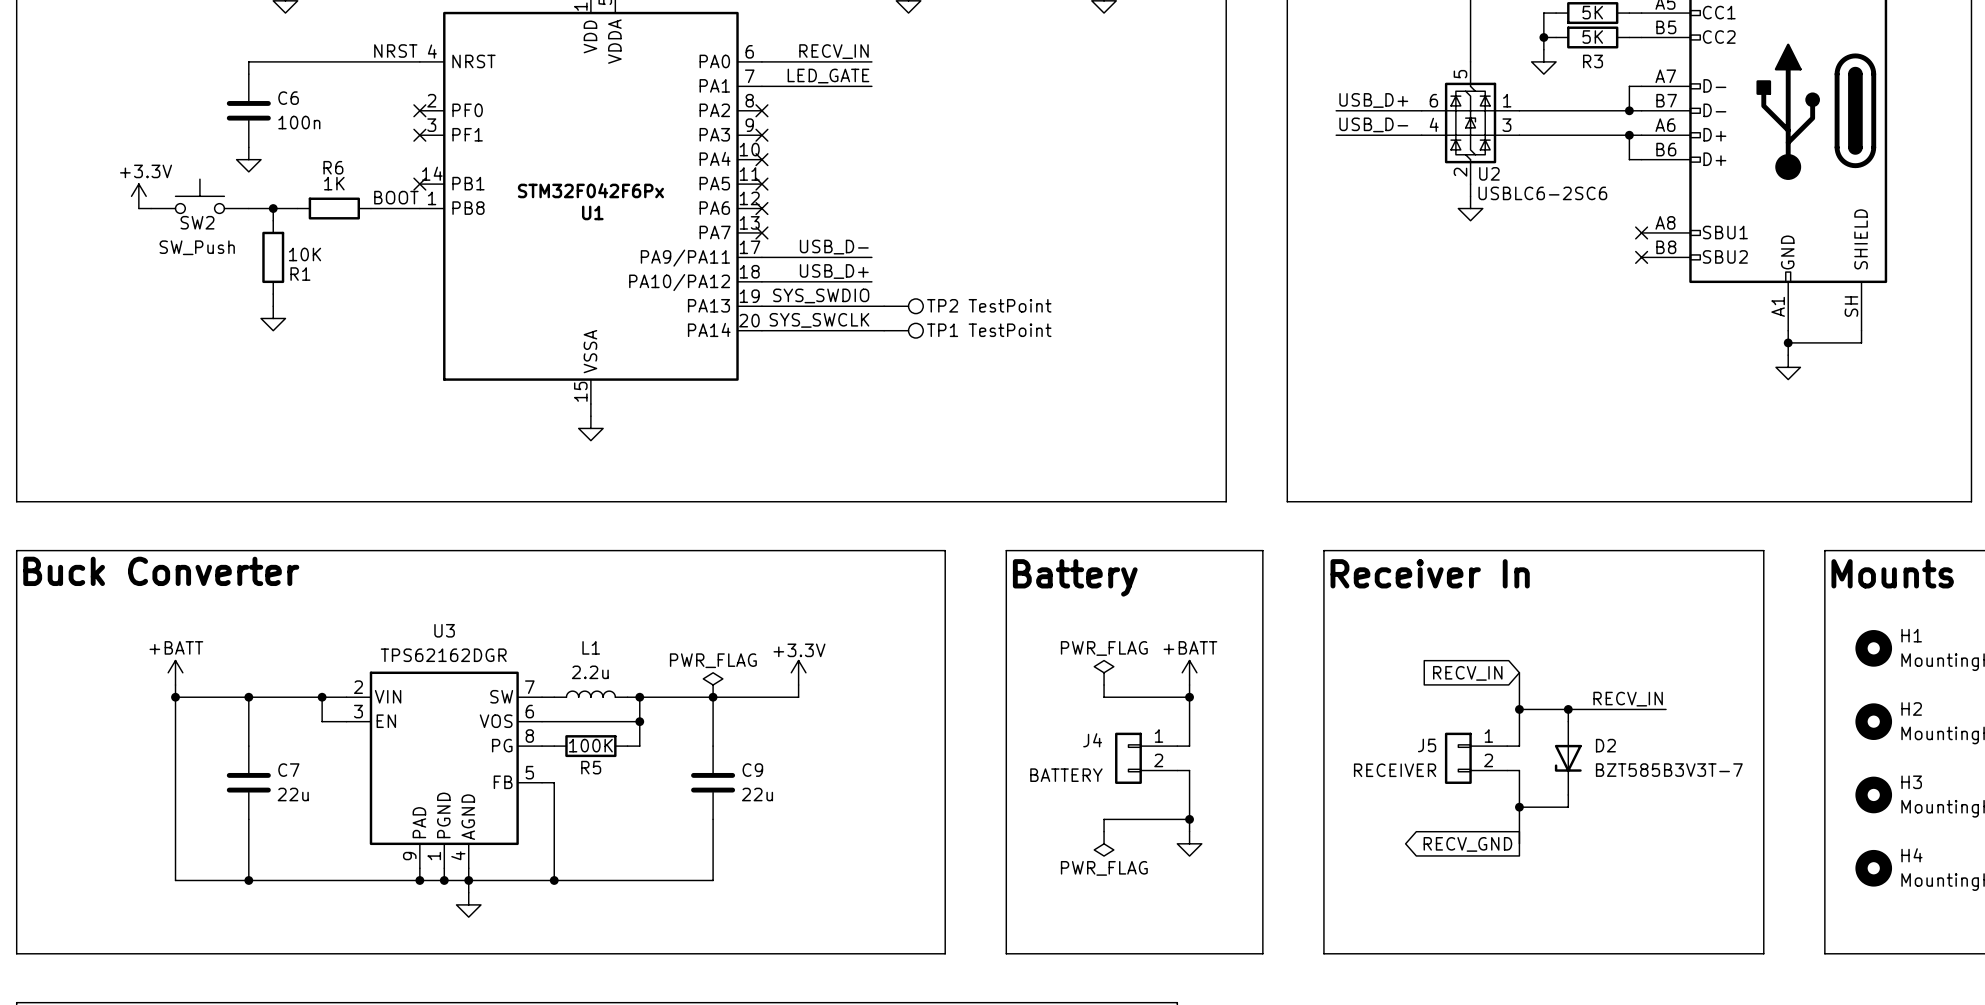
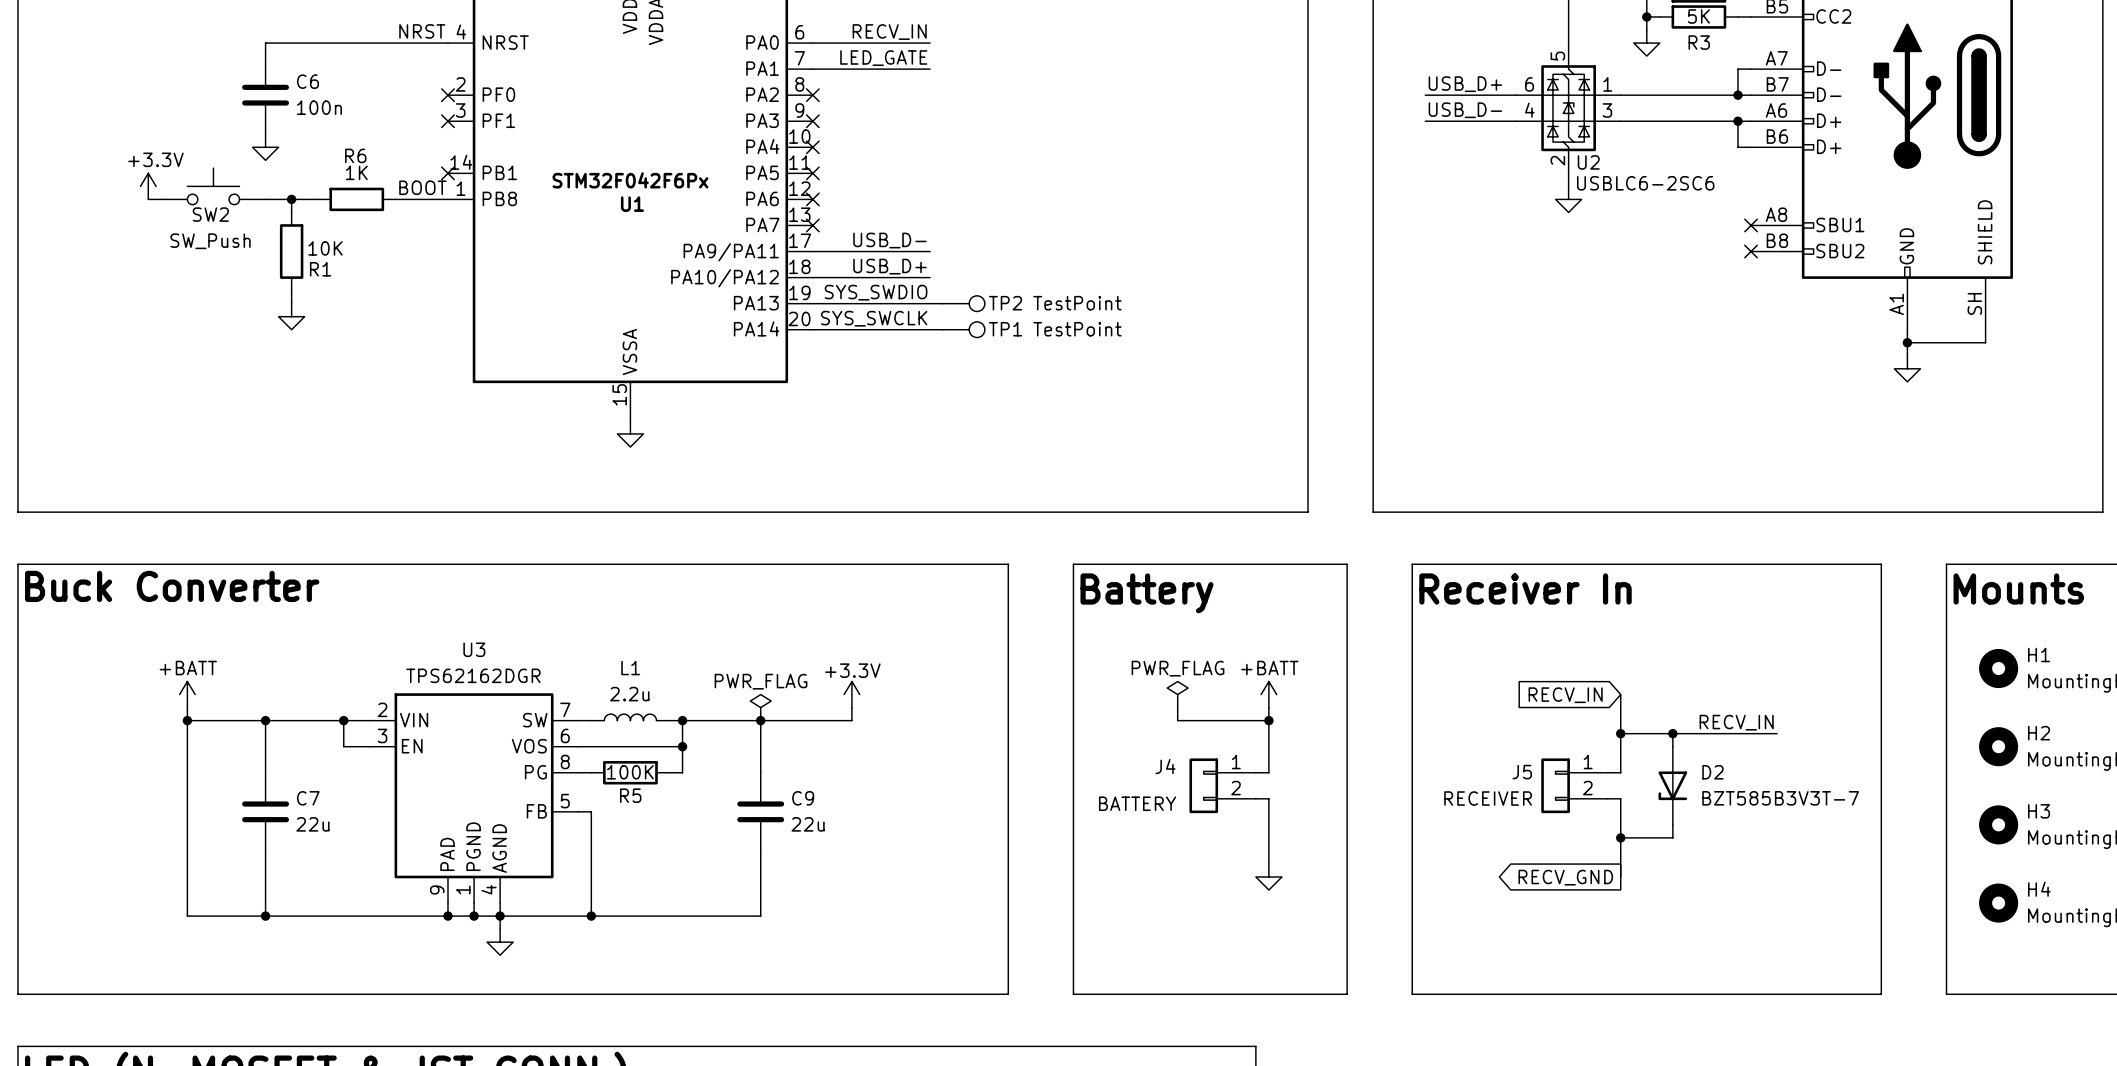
wire: (1189, 819) (1104, 819) (1104, 831) -> none
junction: (1189, 819) -> none
power symbol: PWR_FLAG (1104, 843) -> none

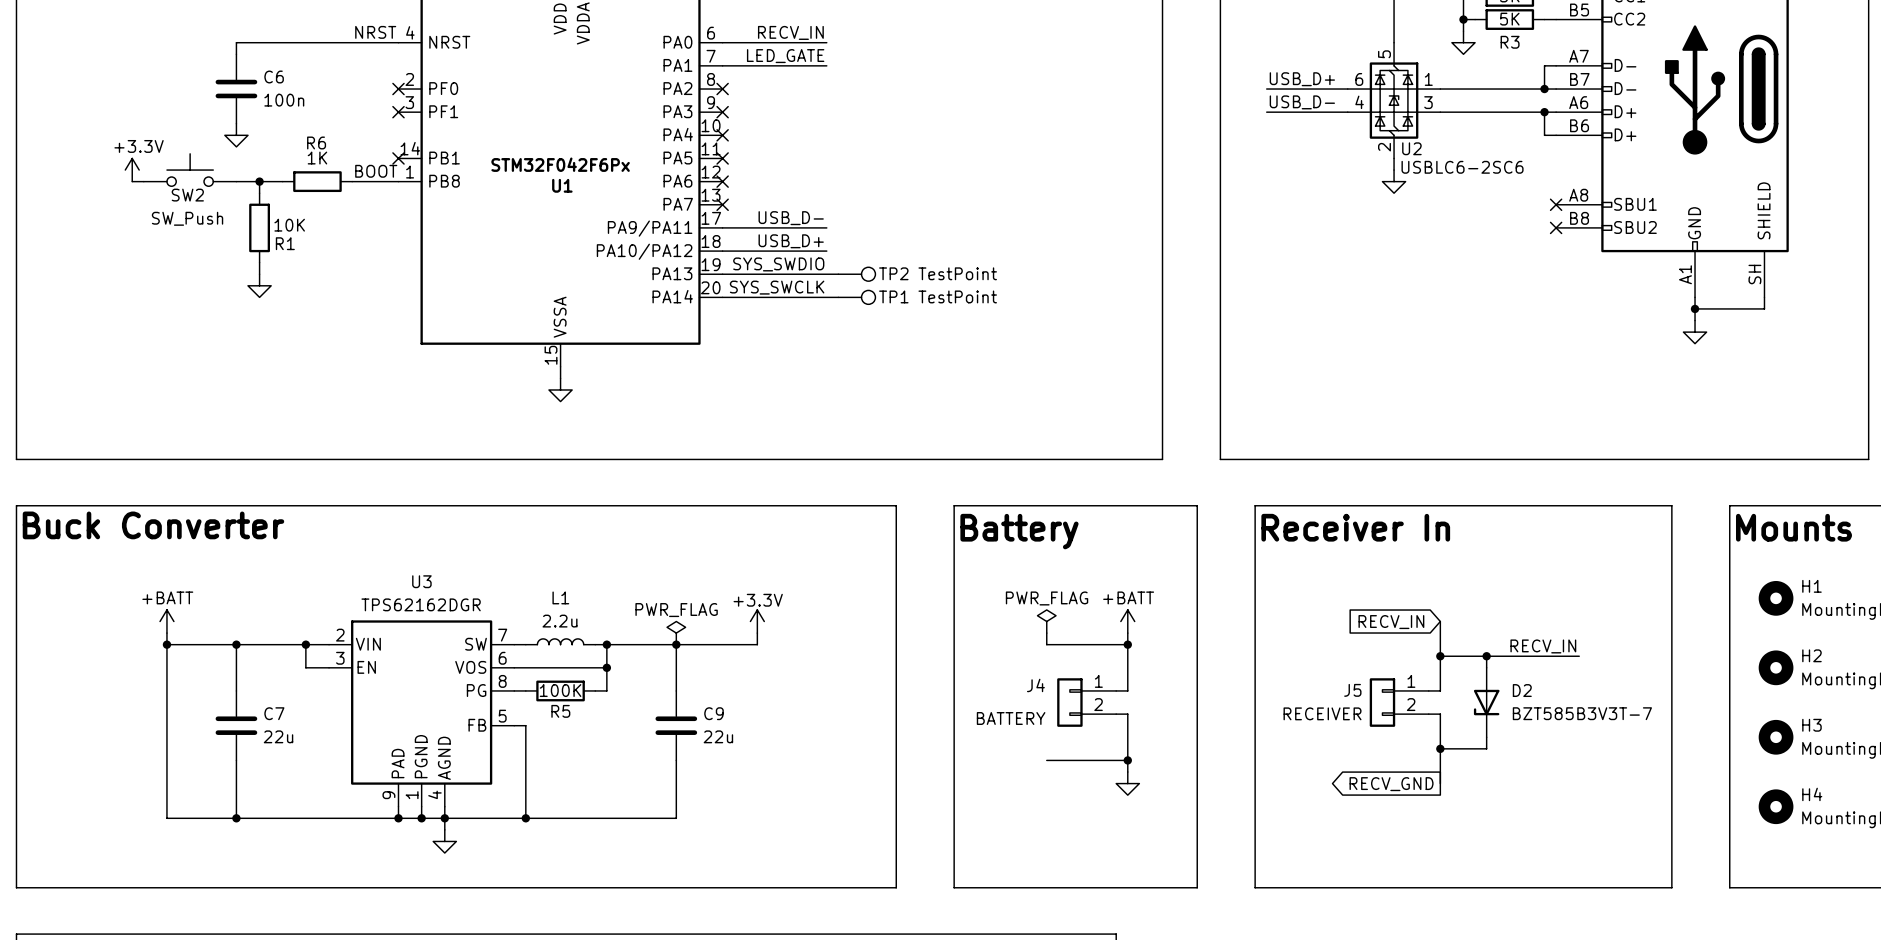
wire: none -> (1046, 760) (1127, 760)
junction: none -> (1127, 760)

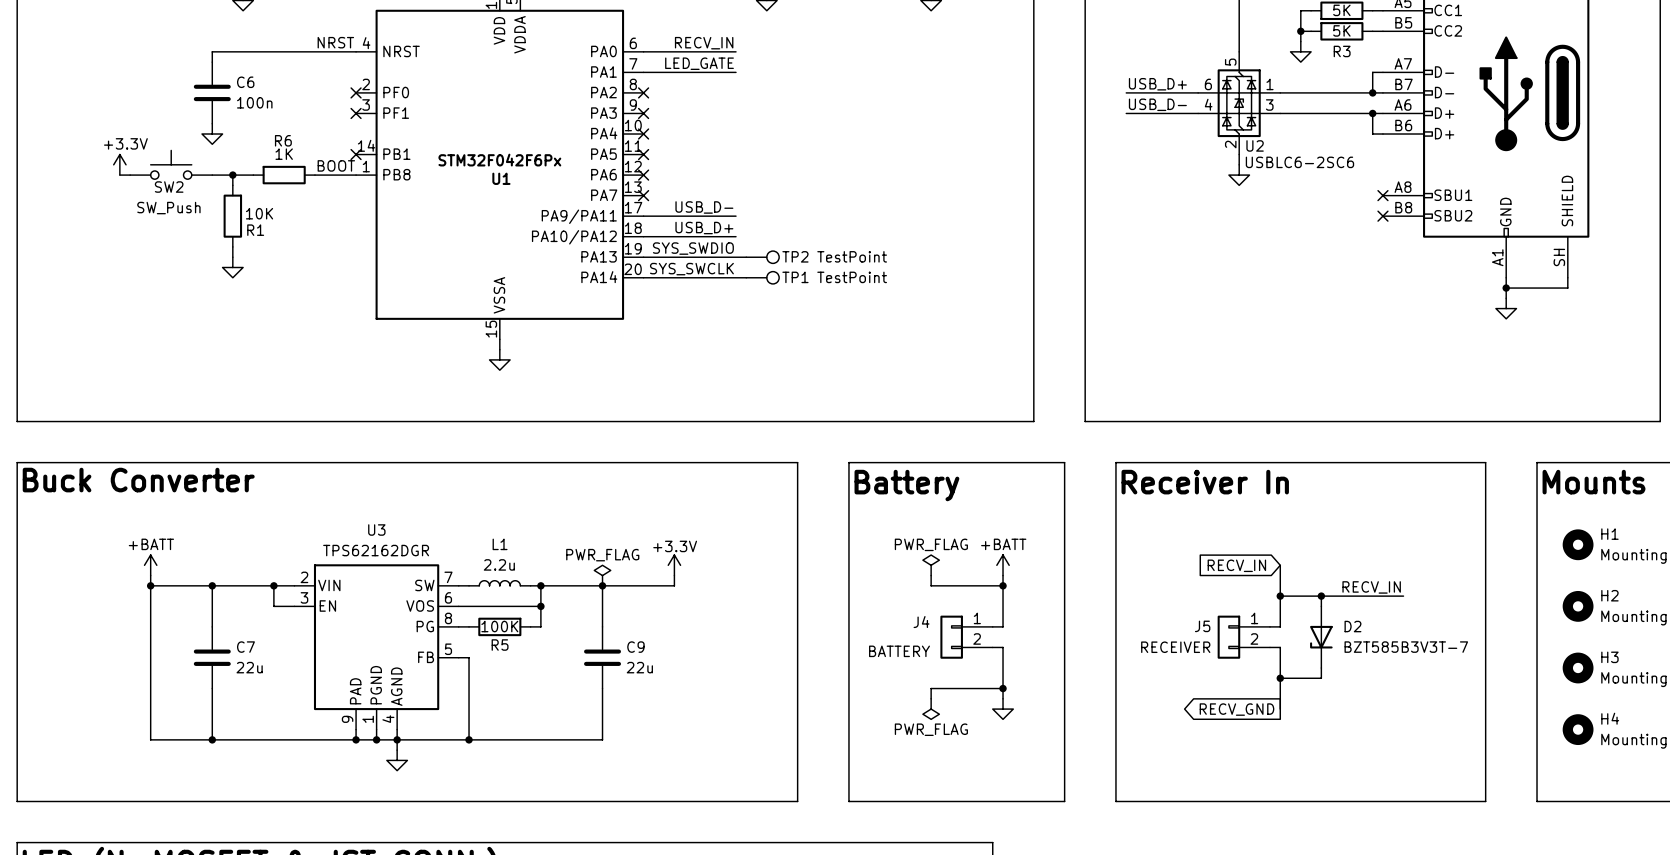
wire: none -> (931, 688) (931, 698)
power symbol: none -> PWR_FLAG (931, 709)

